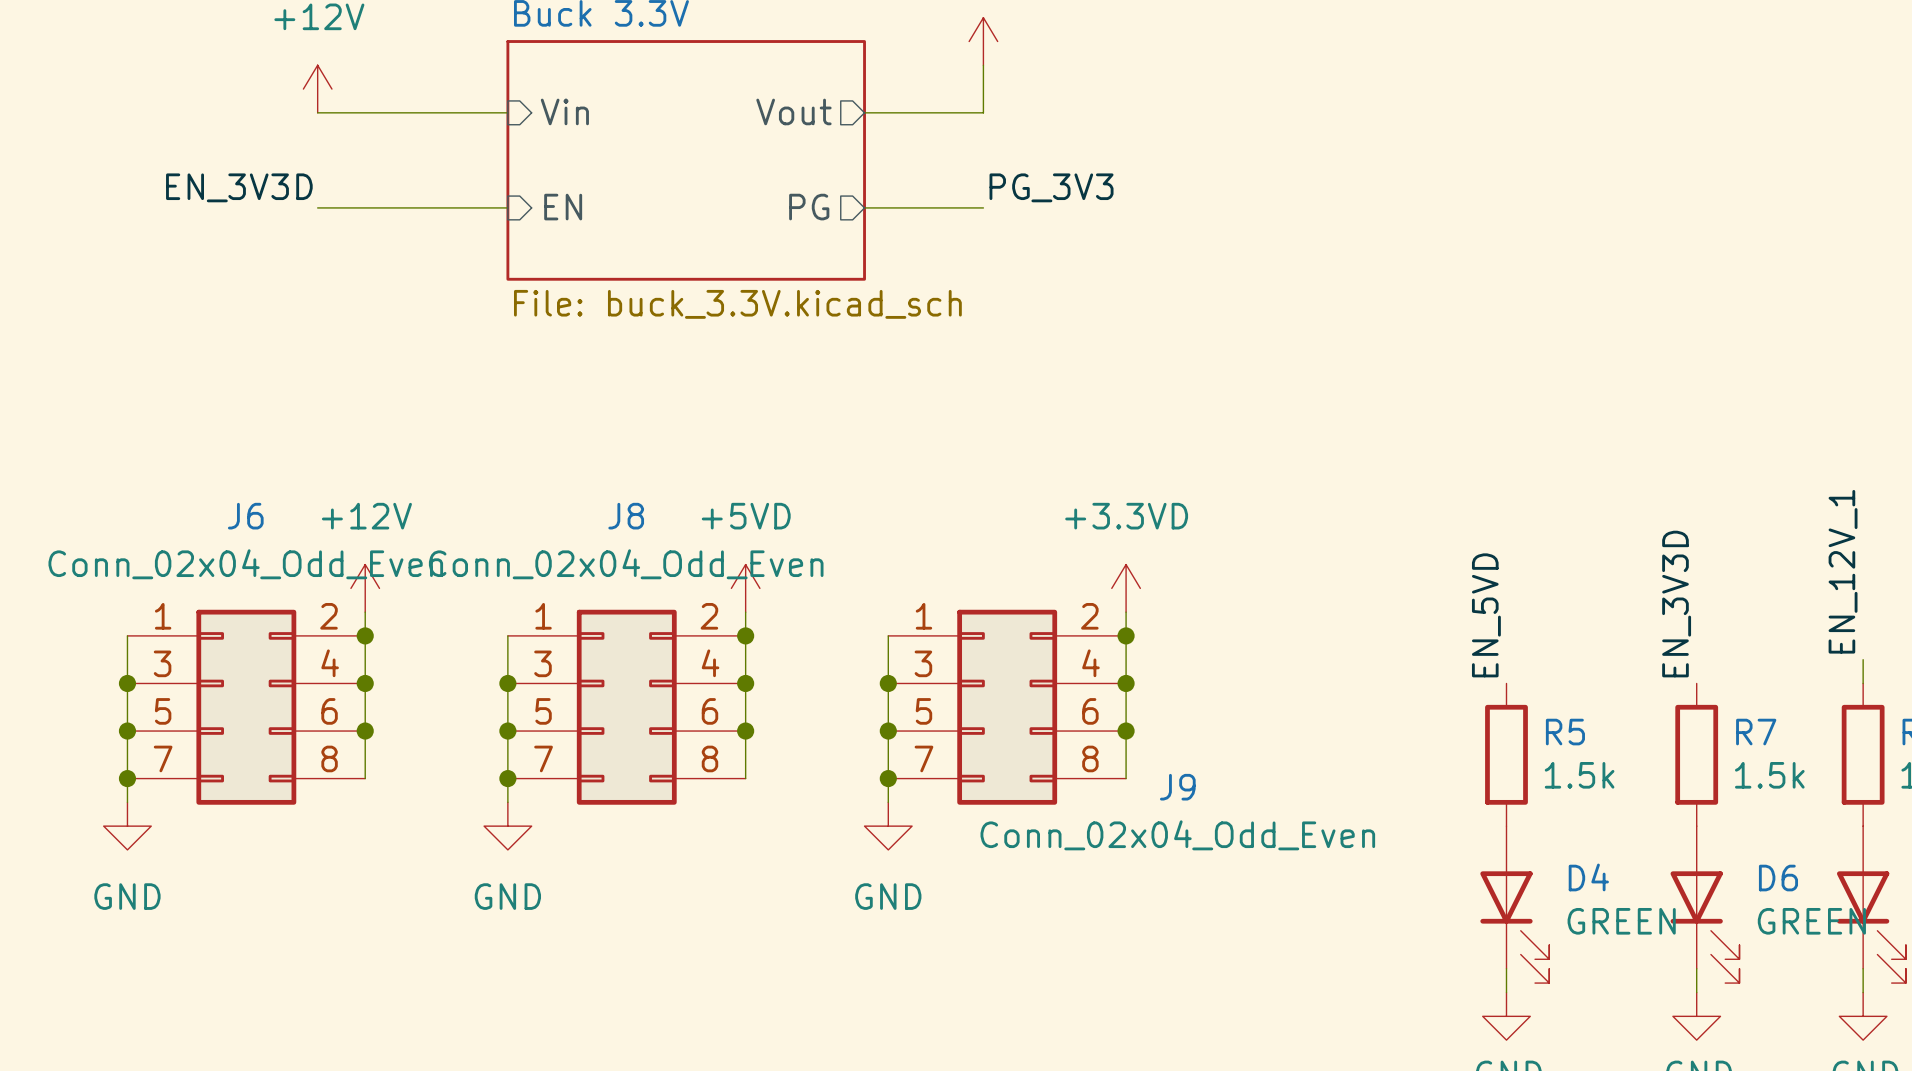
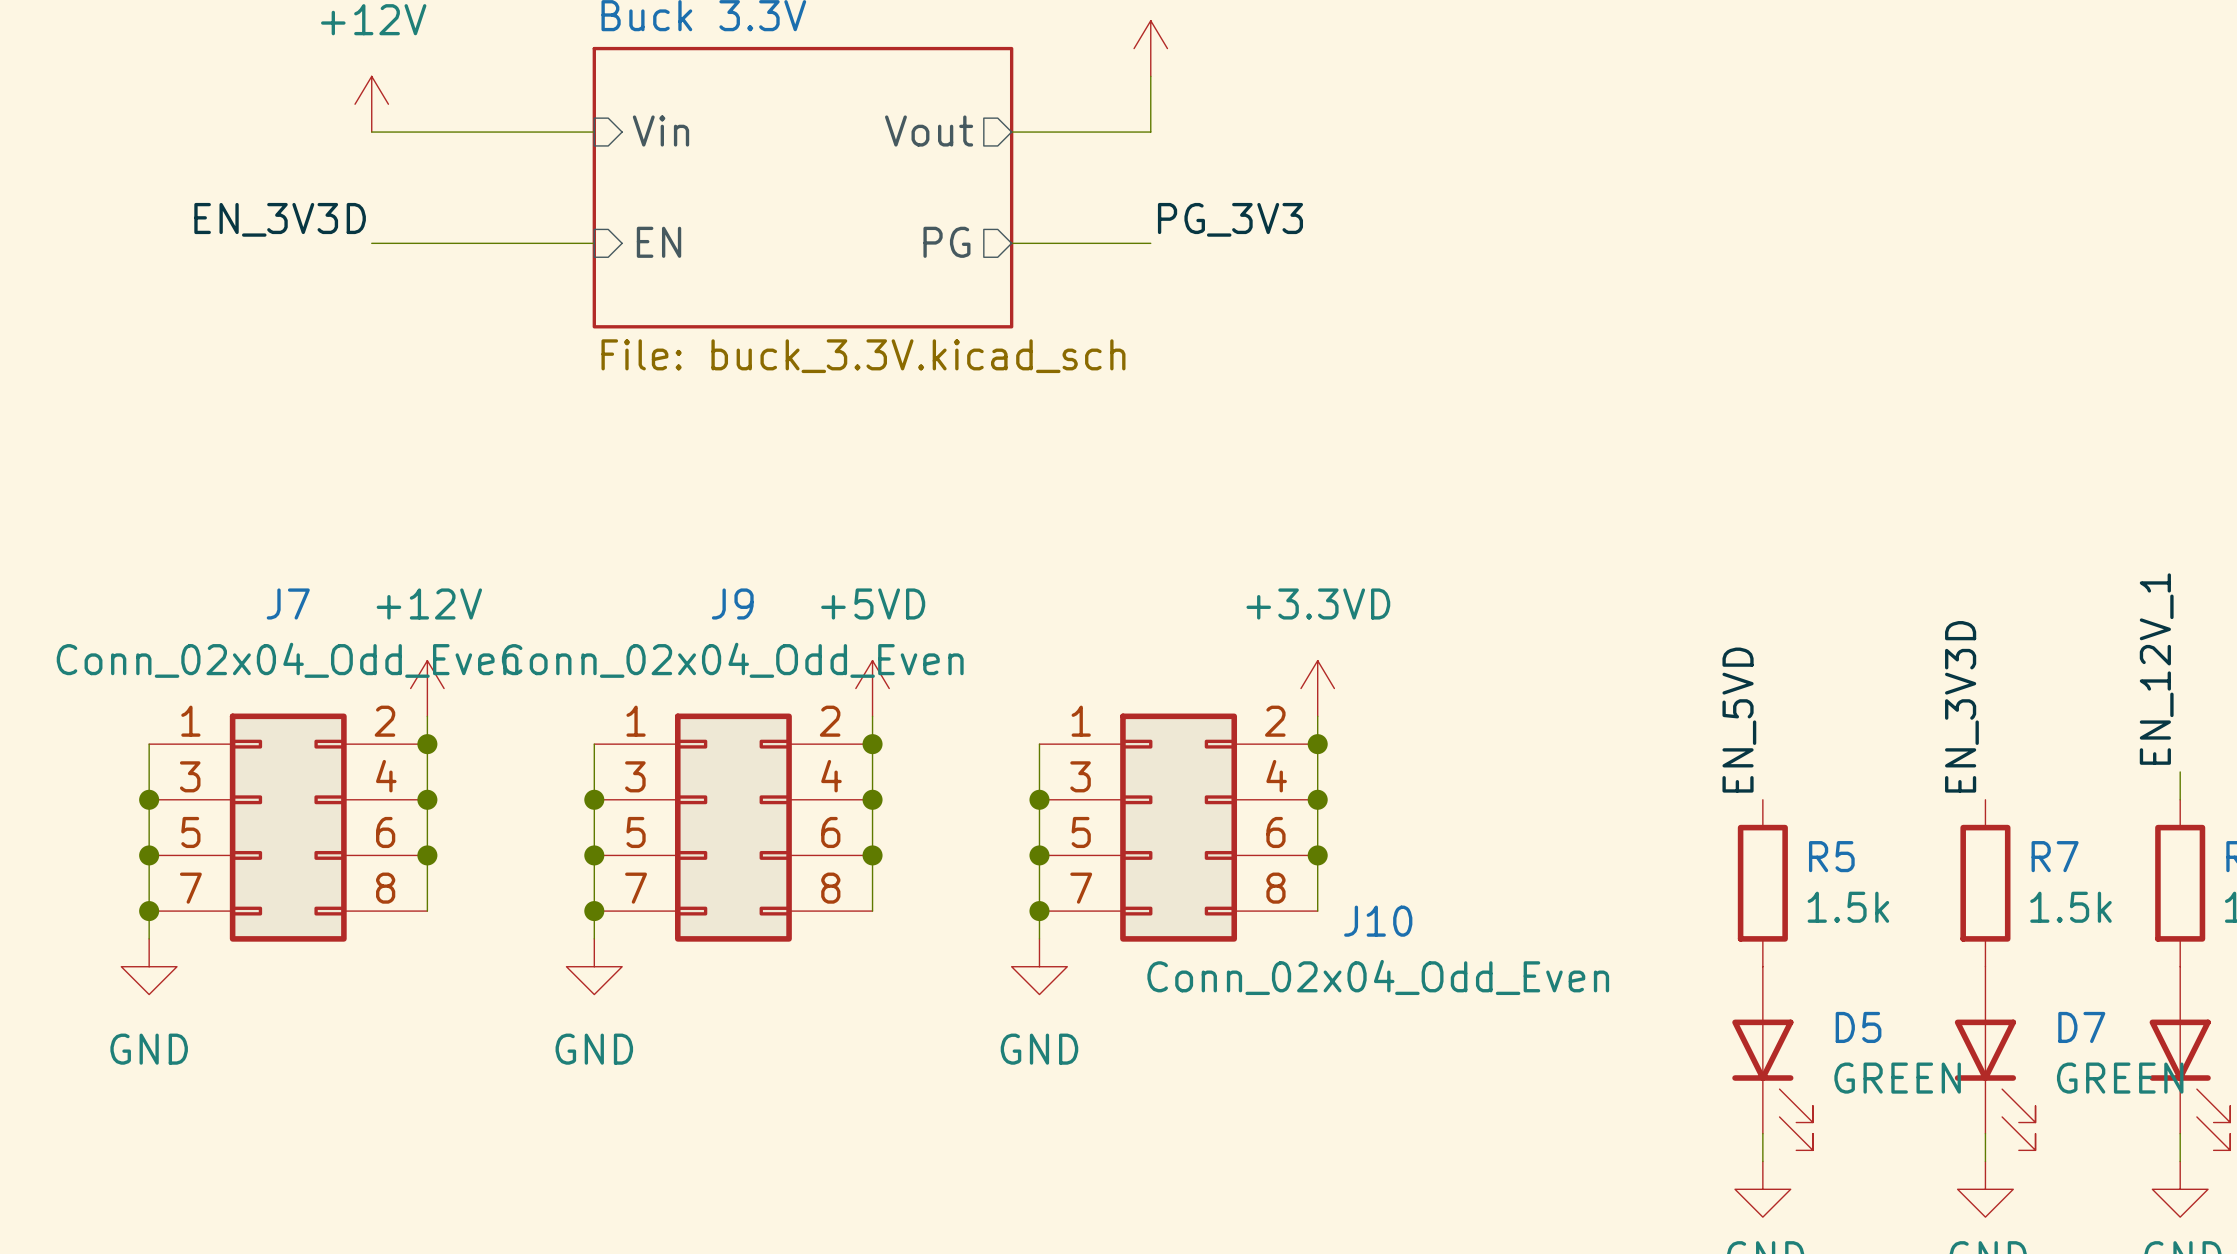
J6 name: J6 (245, 516) -> J7 (288, 603)
J8 name: J8 (626, 516) -> J9 (732, 603)
J9 name: J9 (1177, 787) -> J10 (1378, 921)
D4 name: D4 (1588, 877) -> D5 (1858, 1027)
D6 name: D6 (1778, 878) -> D7 (2081, 1027)

